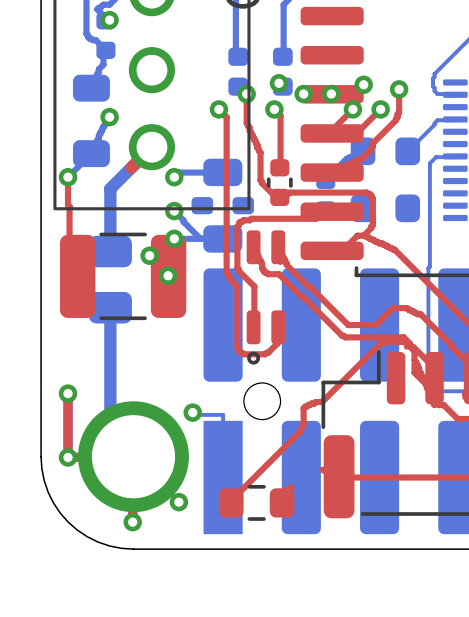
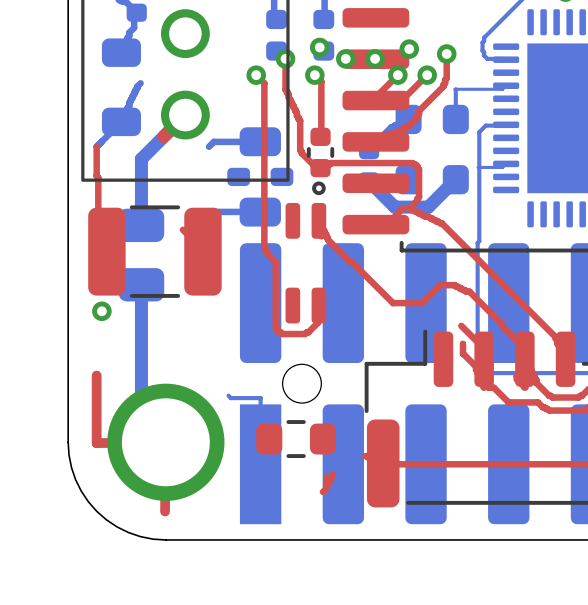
via: (109, 117) -> none
bottom track: (454, 120) (437, 120) (408, 151) -> (506, 85) (502, 89) (454, 89)
bottom track: none -> (455, 89) (455, 119)
via: (68, 177) -> none
via: (174, 177) -> none
bottom track: none -> (506, 163) (502, 167) (478, 167)
bottom track: none -> (455, 179) (428, 207) (394, 207) (369, 181)
bottom track: (174, 211) (200, 238) -> none
via: (174, 211) -> none
top track: (331, 211) (315, 218) (251, 218) (238, 223) (237, 268) (254, 286) (254, 326) -> none
via: (174, 238) -> none
top track: (254, 248) (265, 272) (279, 274) (342, 335) (403, 337) (414, 351) (414, 360) (425, 383) -> none
via: (149, 255) -> none
via: (168, 275) -> none
part rotation: 0° (265, 297) -> 180° (305, 252)
via: none -> (101, 311)
top track: (406, 346) (405, 341) (380, 343) (322, 402) (315, 402) (305, 406) (303, 423) (300, 431) (232, 499) (231, 503) -> none
via: (68, 393) -> none
via: (192, 412) -> none
via: (68, 457) -> none
via: (178, 502) -> none
part position: (256, 502) -> (296, 439)
via: (132, 522) -> none

